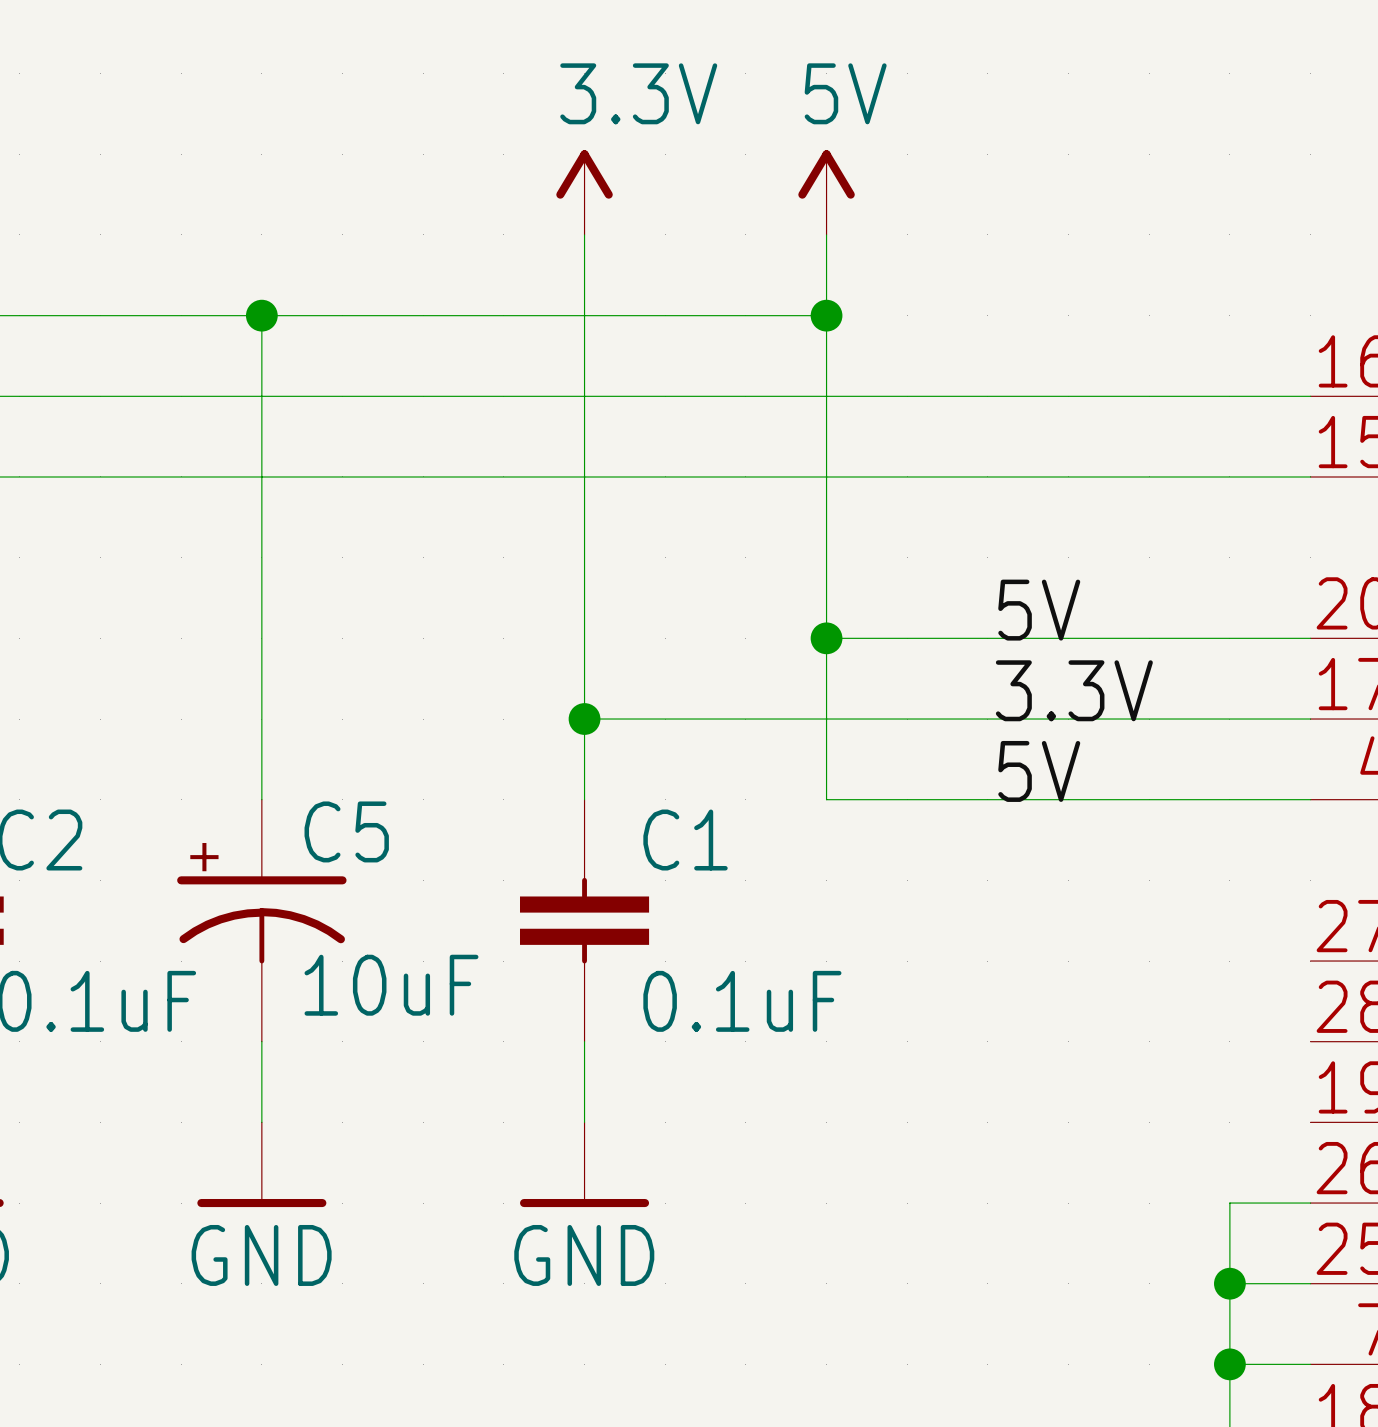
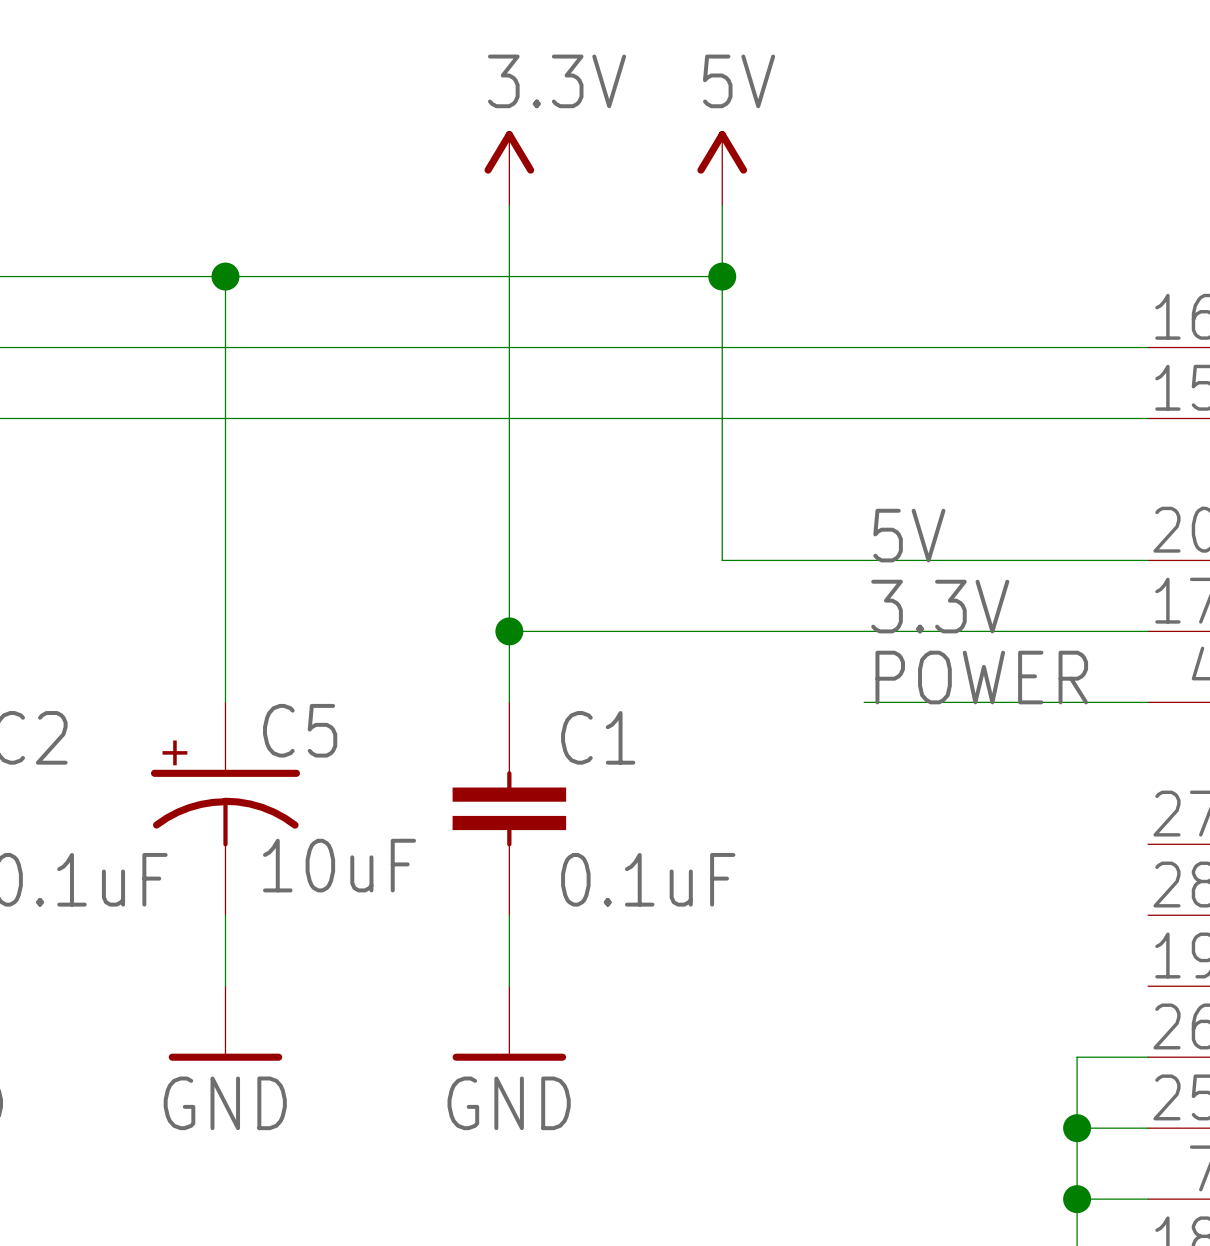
wire: (826, 638) (826, 799) (987, 799) -> none
junction: (826, 638) -> none
label: 5V (1039, 771) -> POWER (981, 677)

